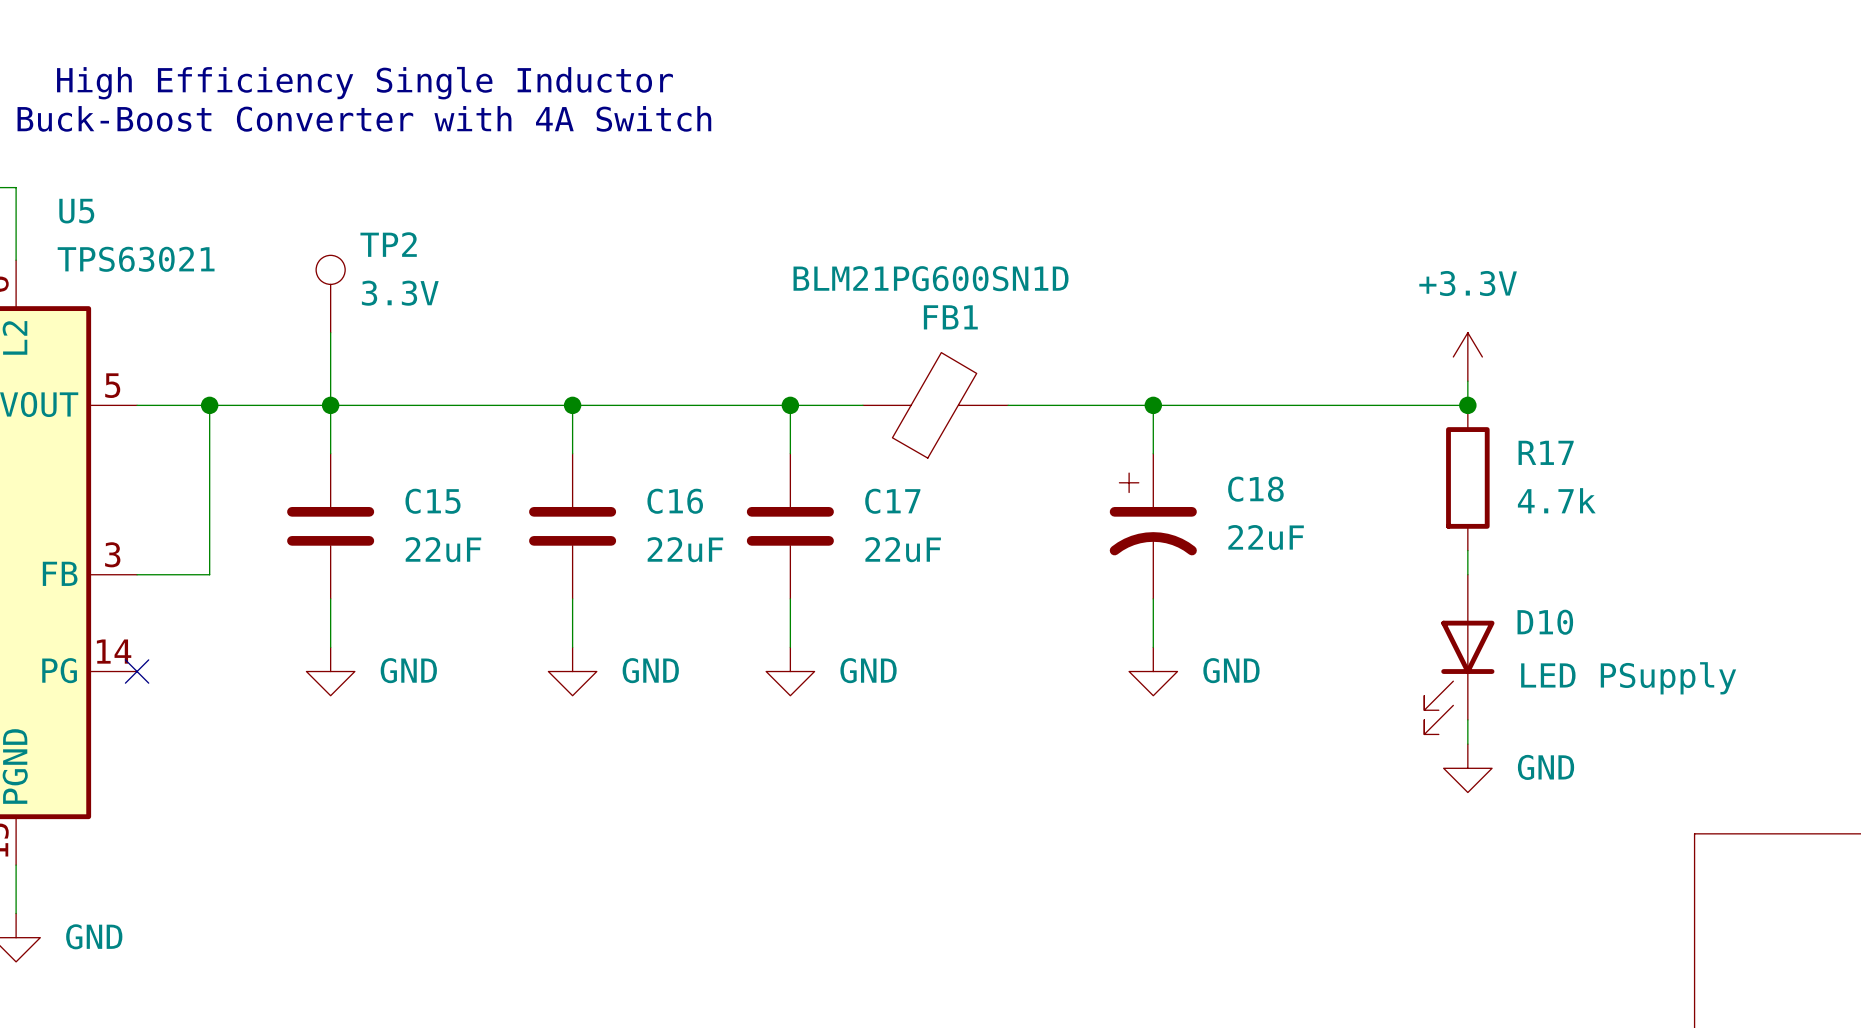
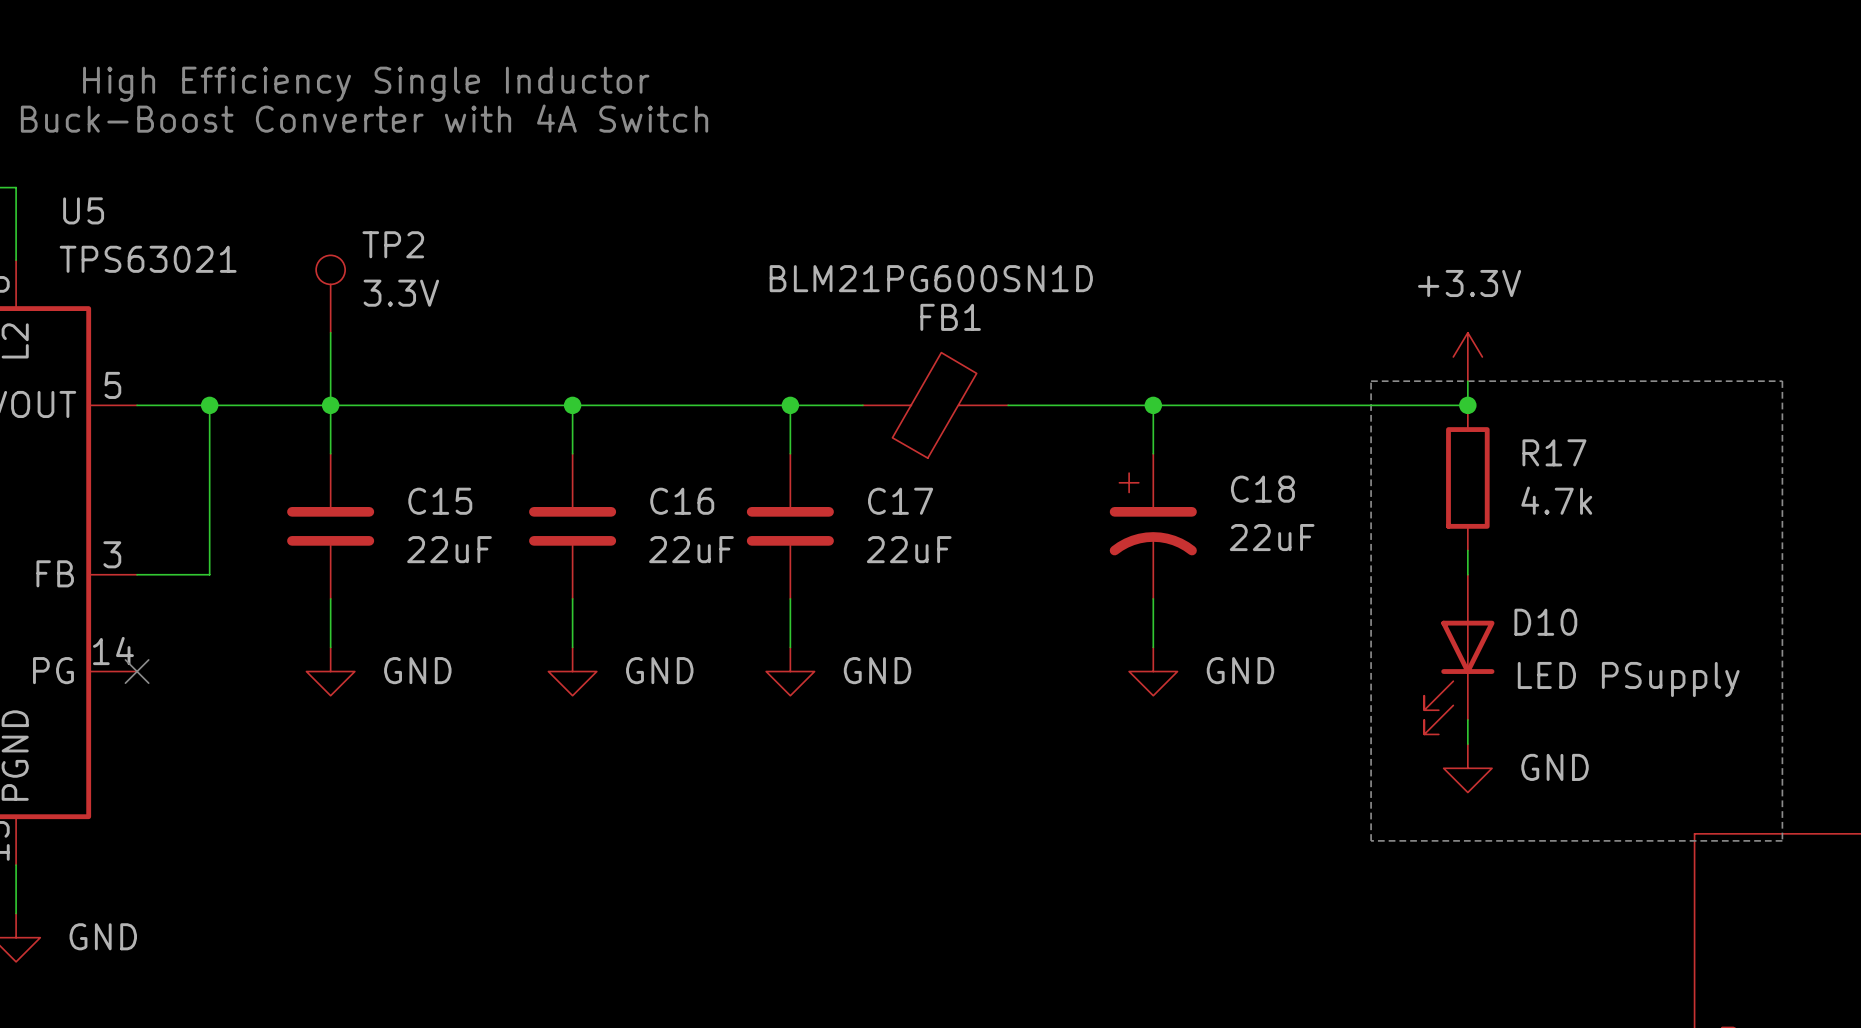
line: none -> (1371, 381) (1782, 381) (1782, 840) (1371, 840) (1371, 381)

